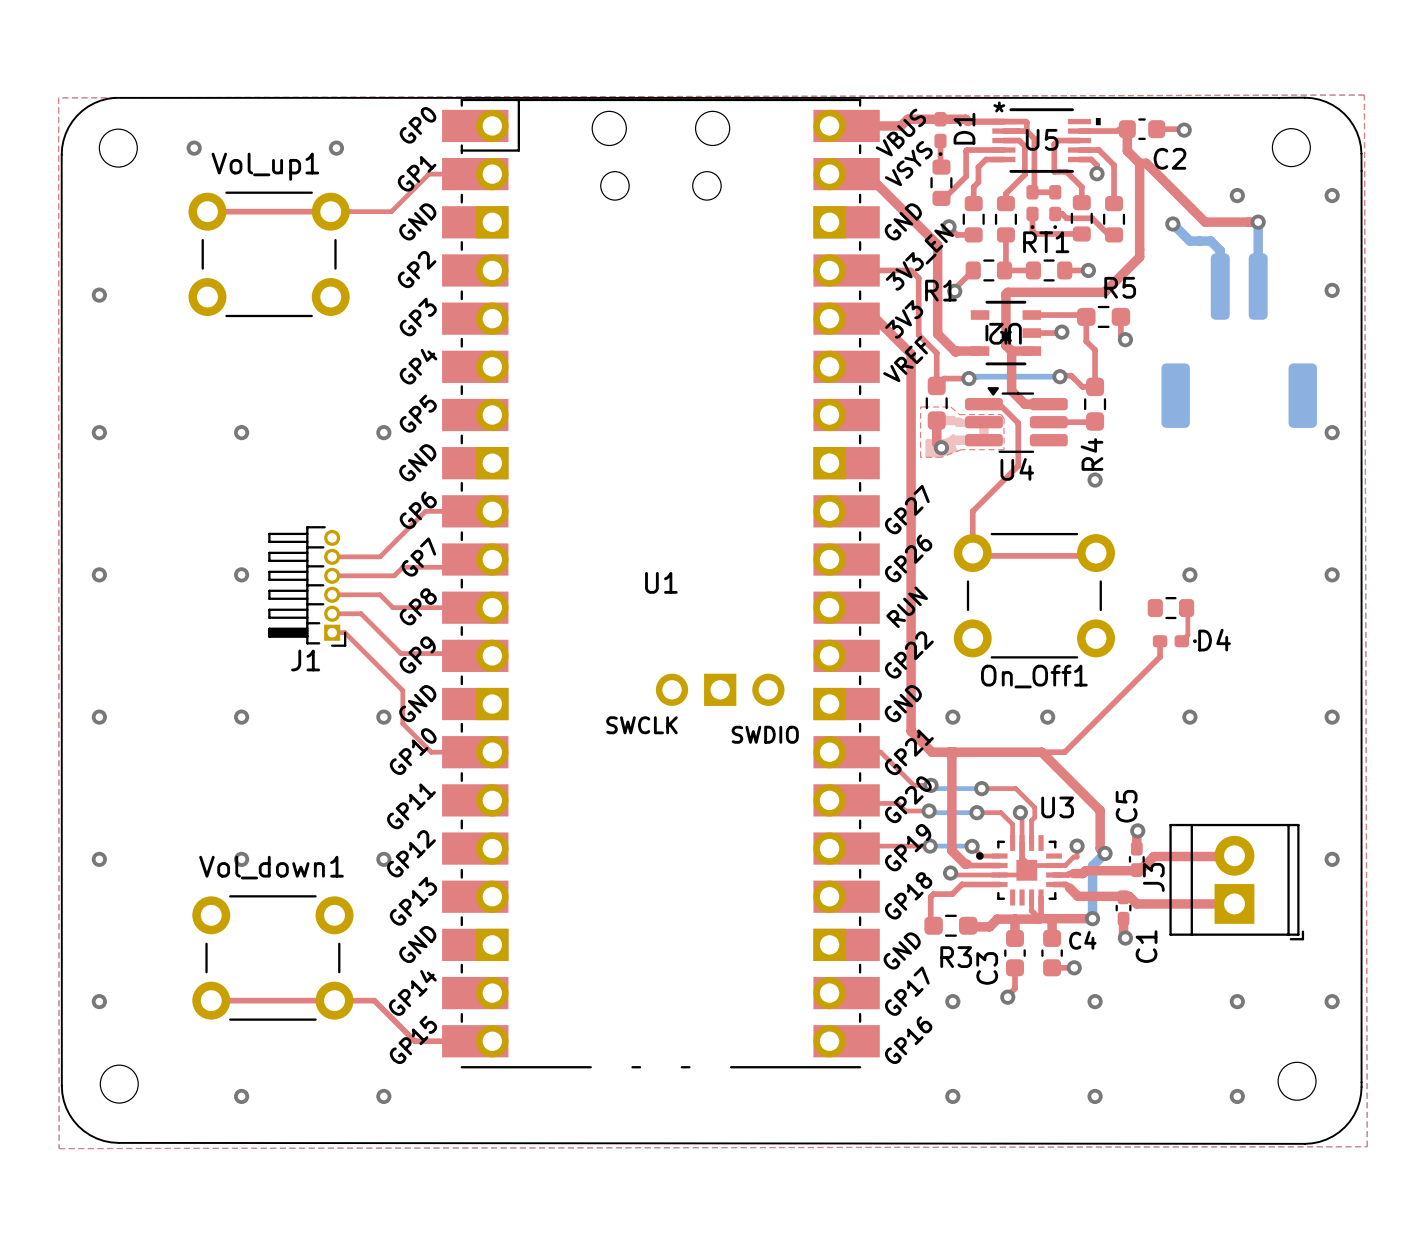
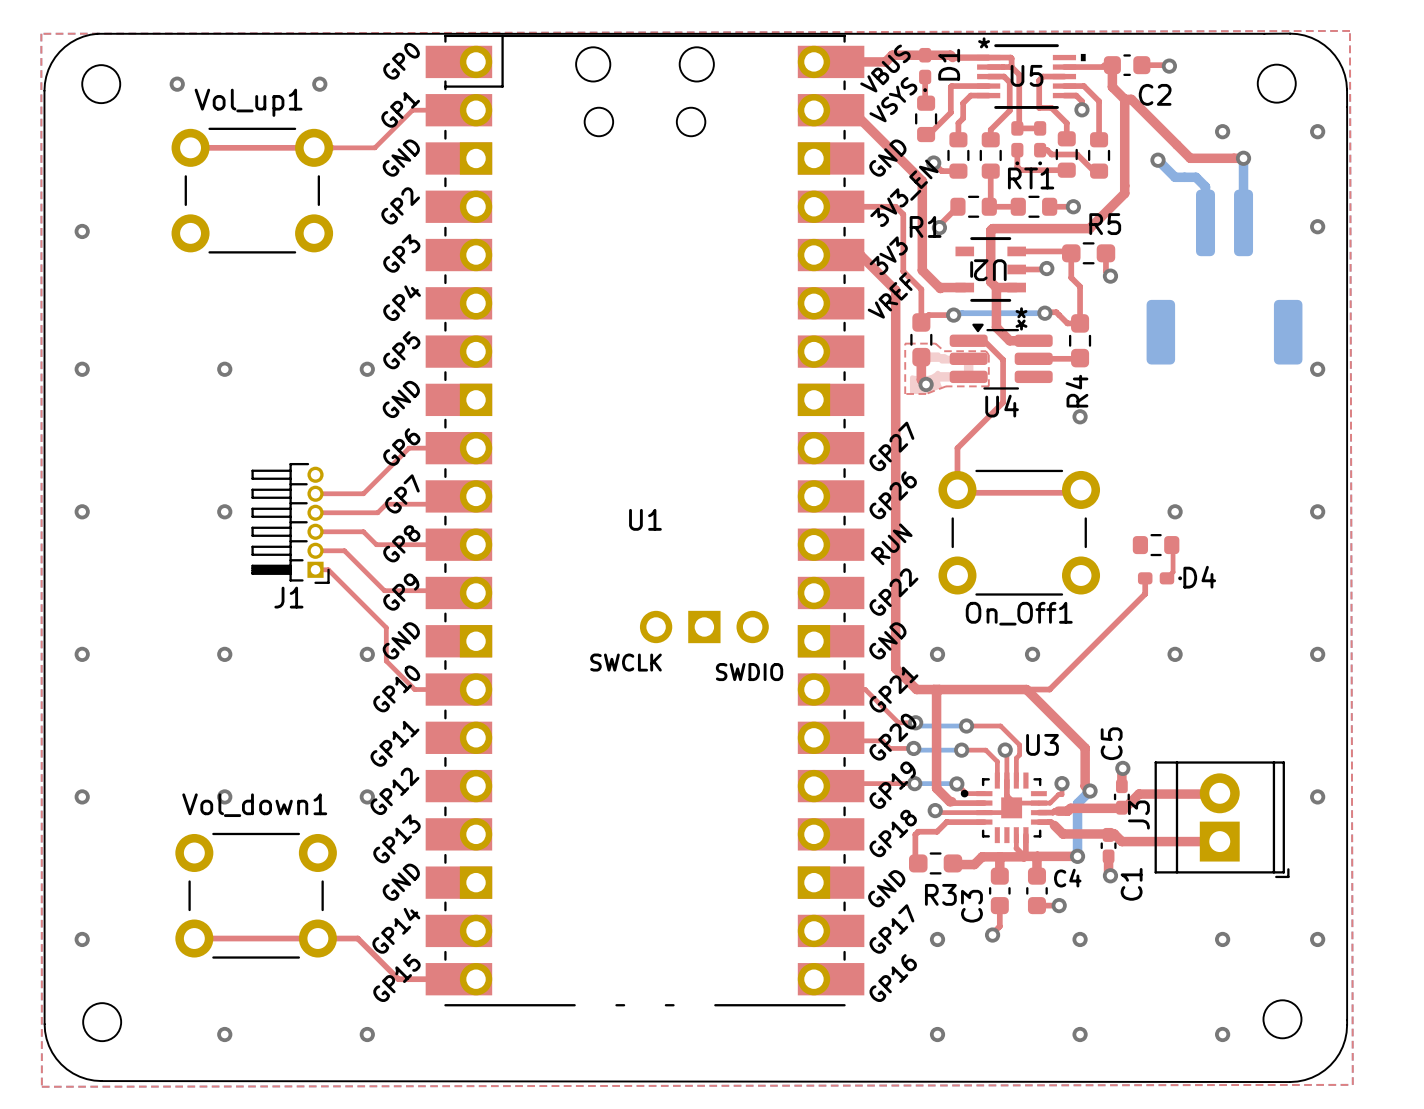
U2 footprint: [970, 300, 1042, 366] -> [955, 237, 1026, 302]

